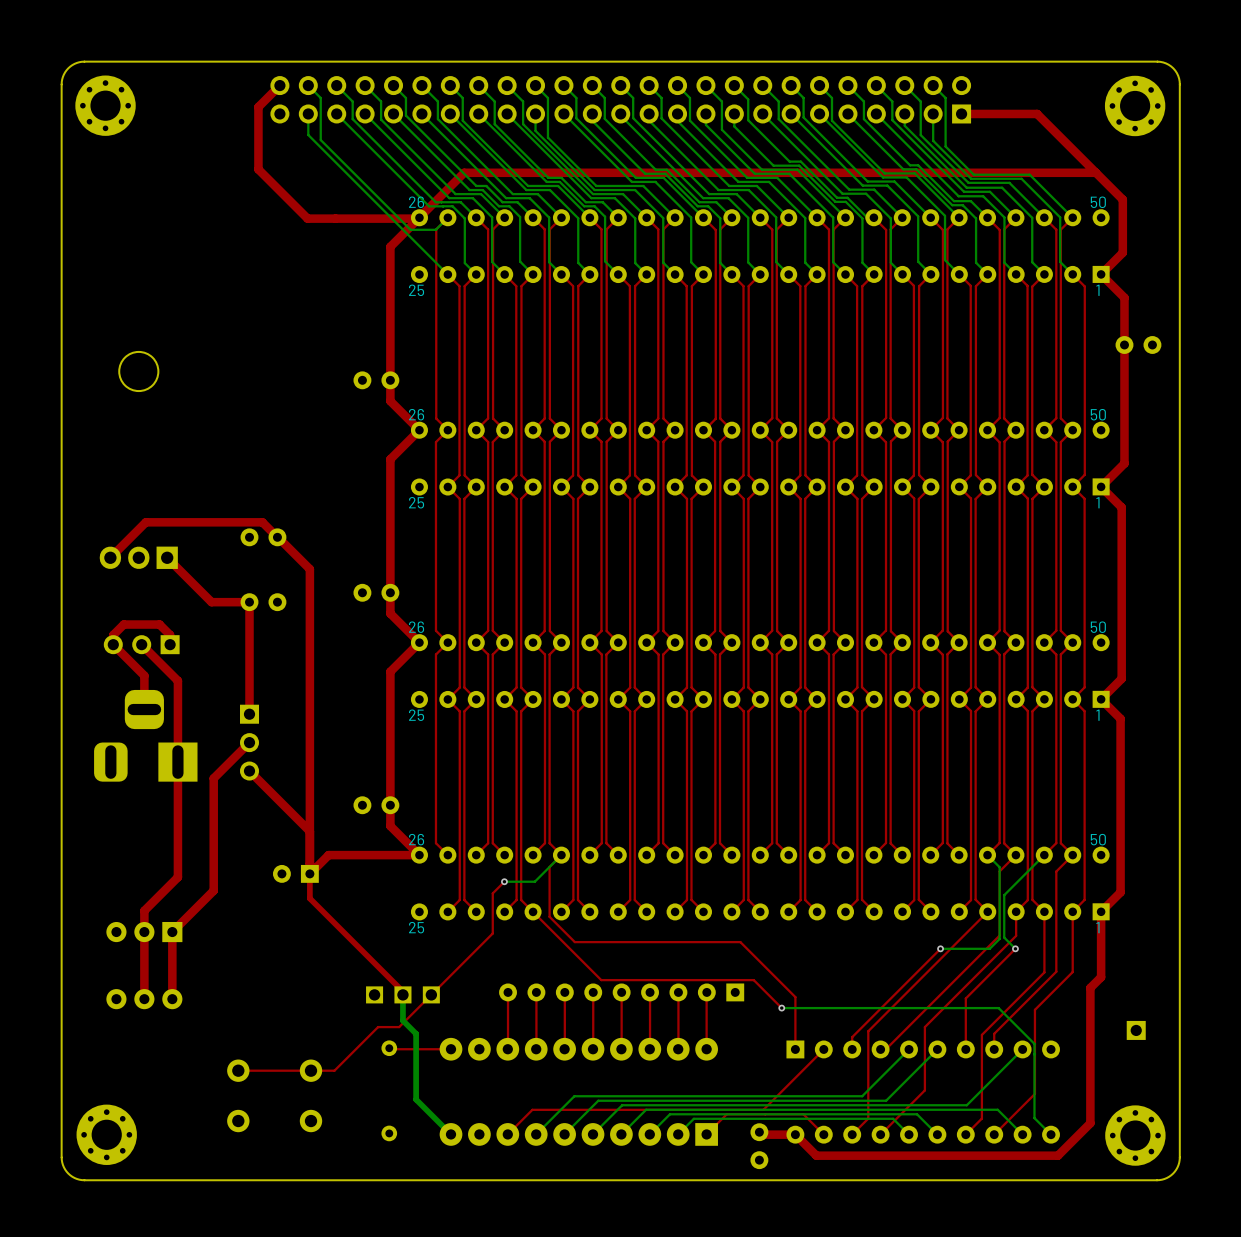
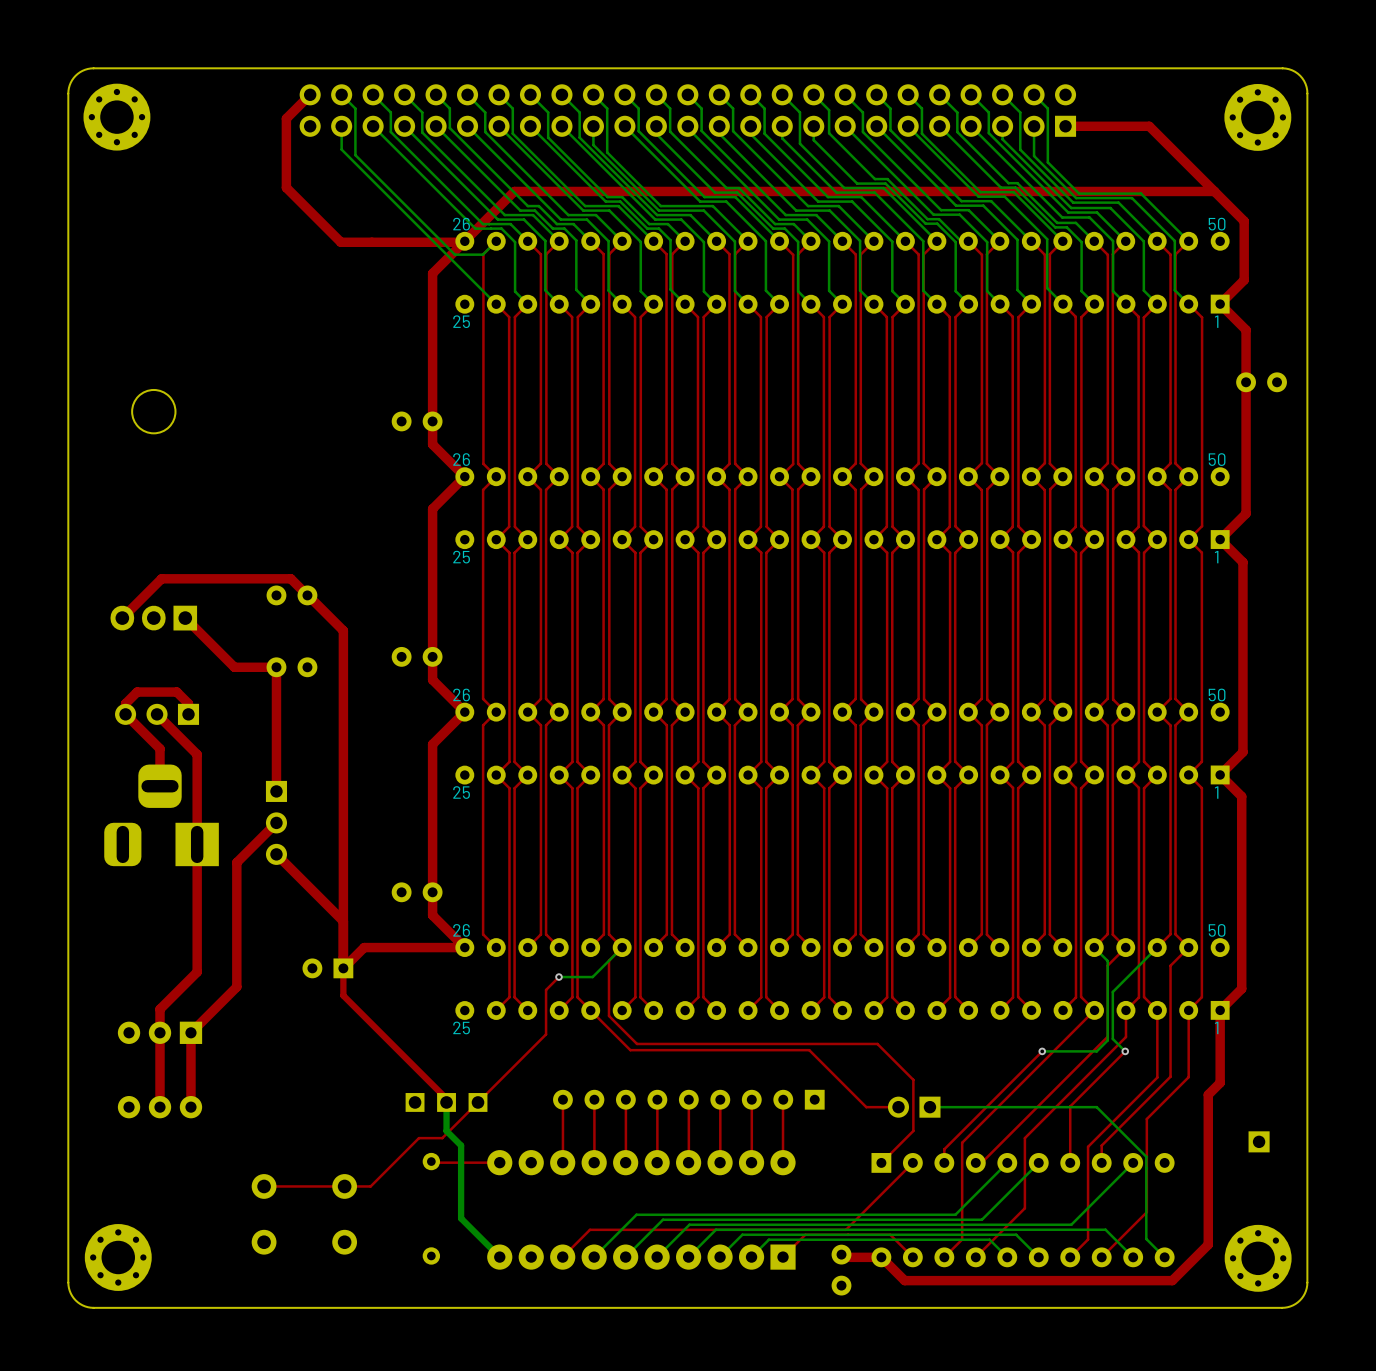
top track: (740, 942) (795, 997) (795, 1049) -> (820, 1043) (877, 1043) (913, 1079) (913, 1130) (881, 1162)
top track: (568, 947) (601, 980) (753, 980) (781, 1008) -> (630, 1050) (809, 1050) (866, 1107) (898, 1107)
part: none -> (914, 1107)
via: (781, 1008) -> none
bottom track: (998, 1008) (781, 1008) -> (1106, 1117) (1096, 1107) (929, 1107)

